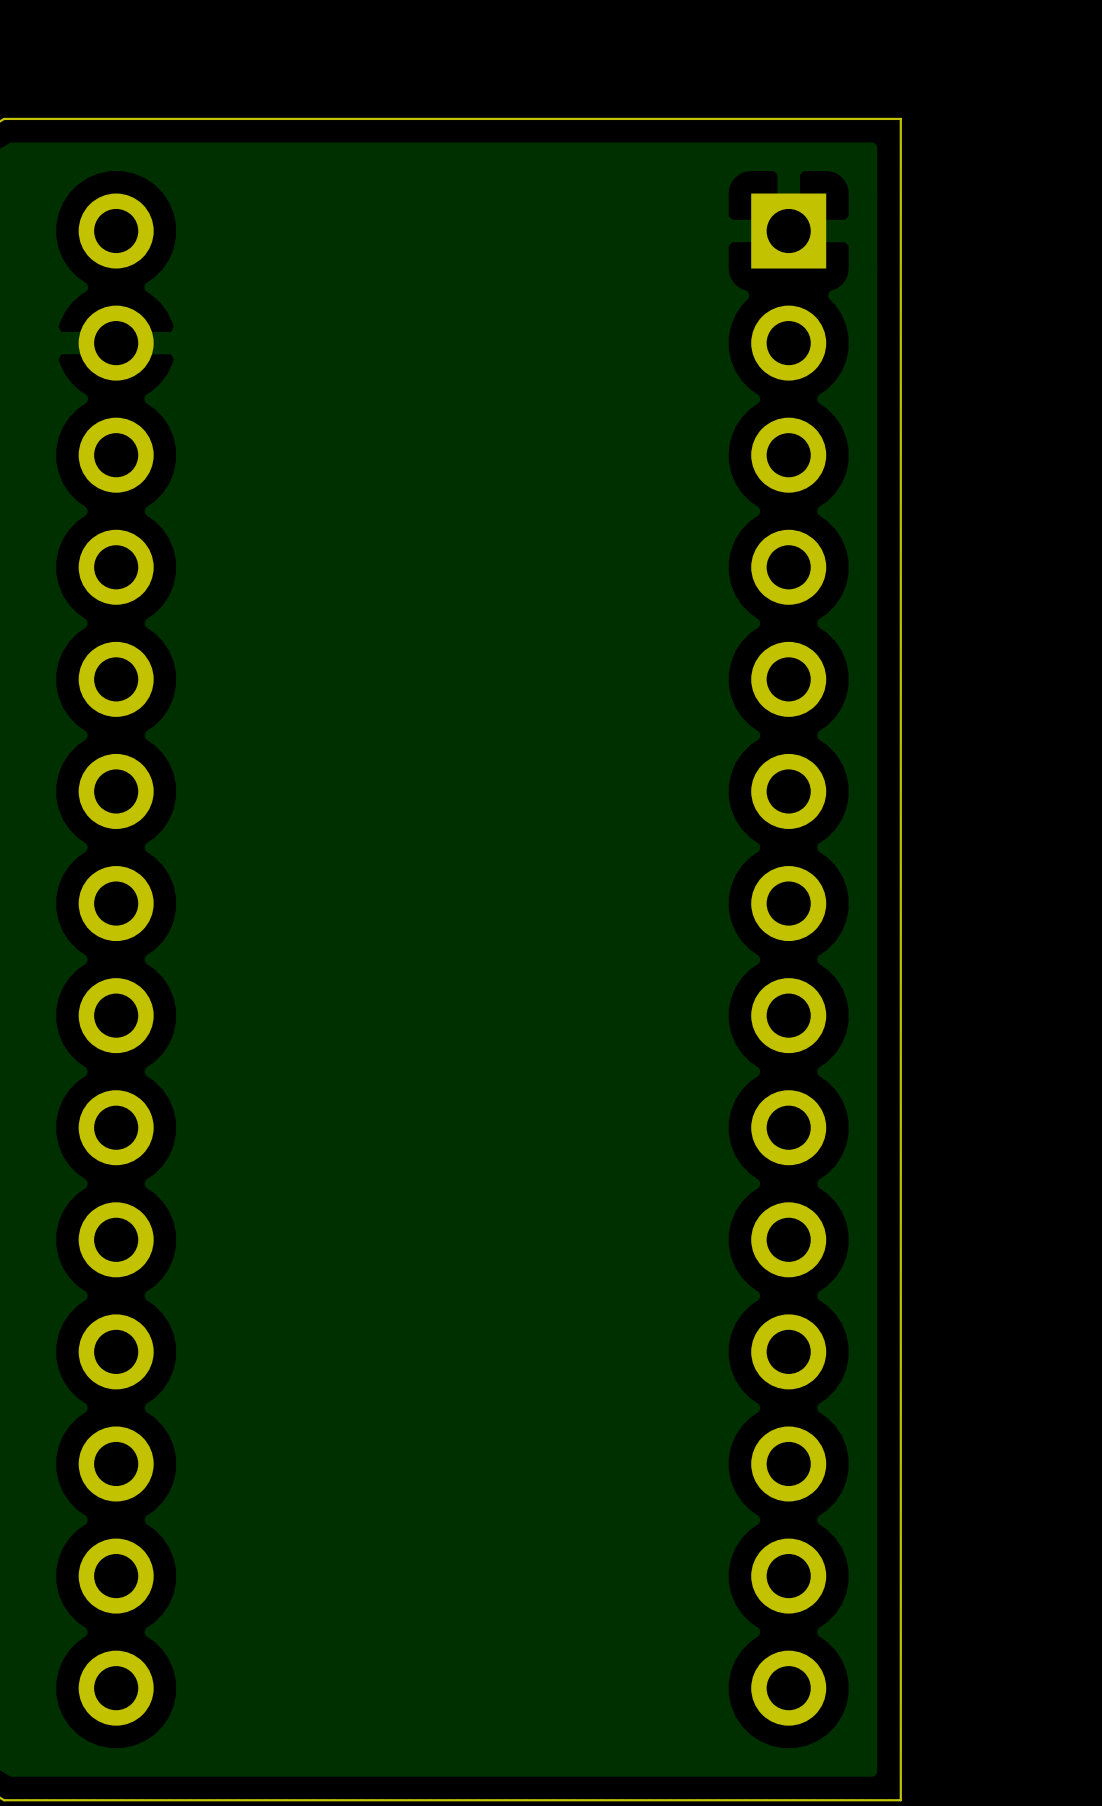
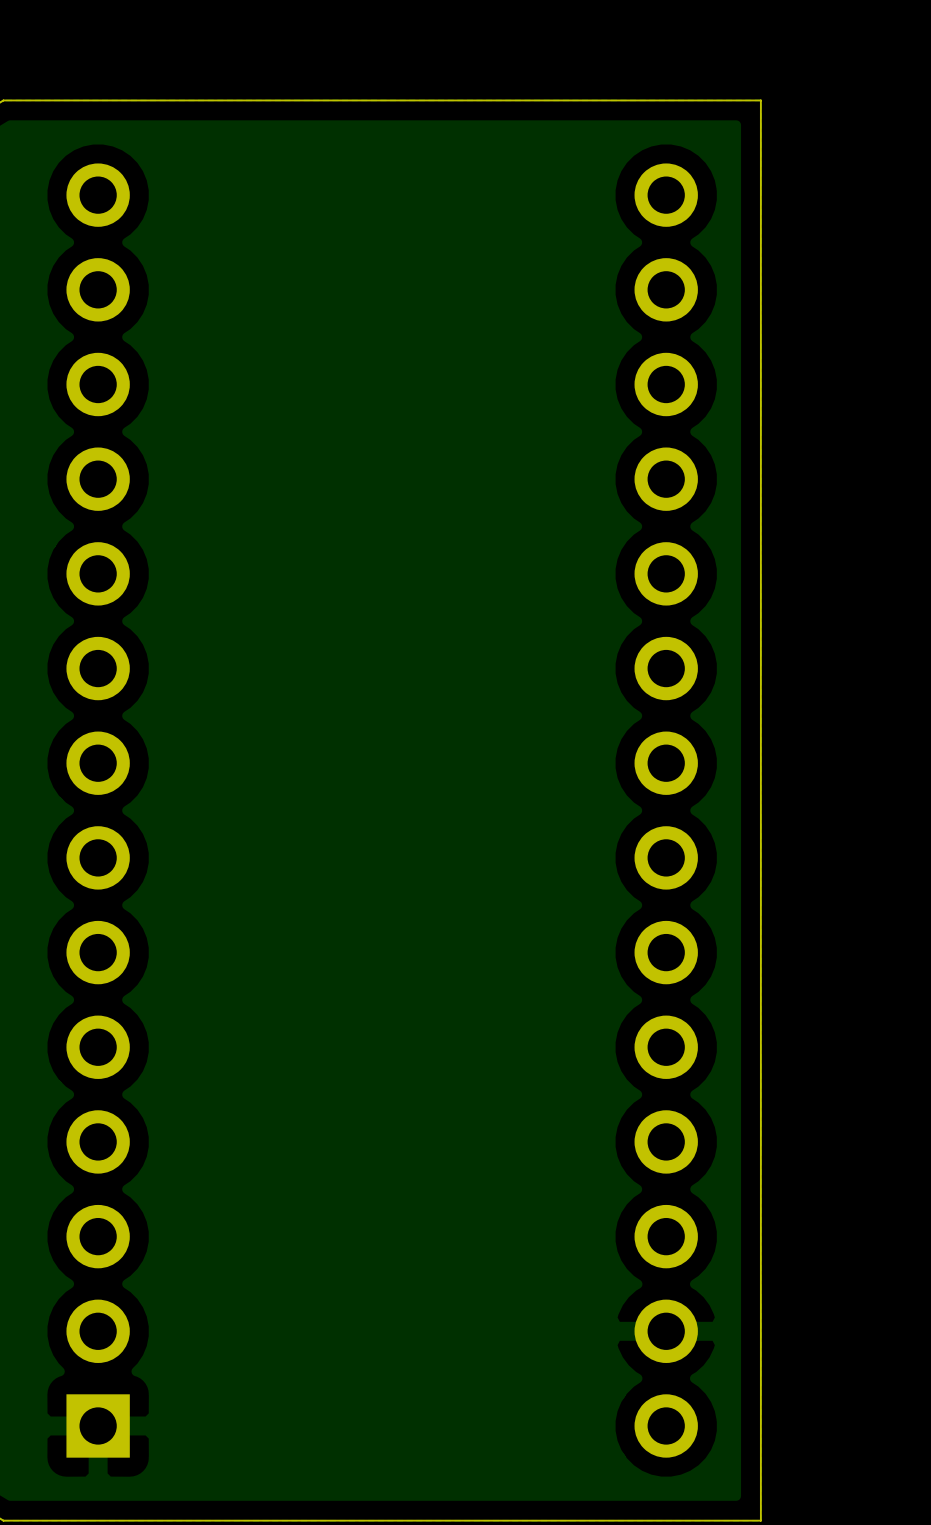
part footprint: [78, 193, 154, 1726] -> [66, 163, 130, 1458]
part footprint: [751, 193, 827, 1726] -> [634, 163, 698, 1458]

